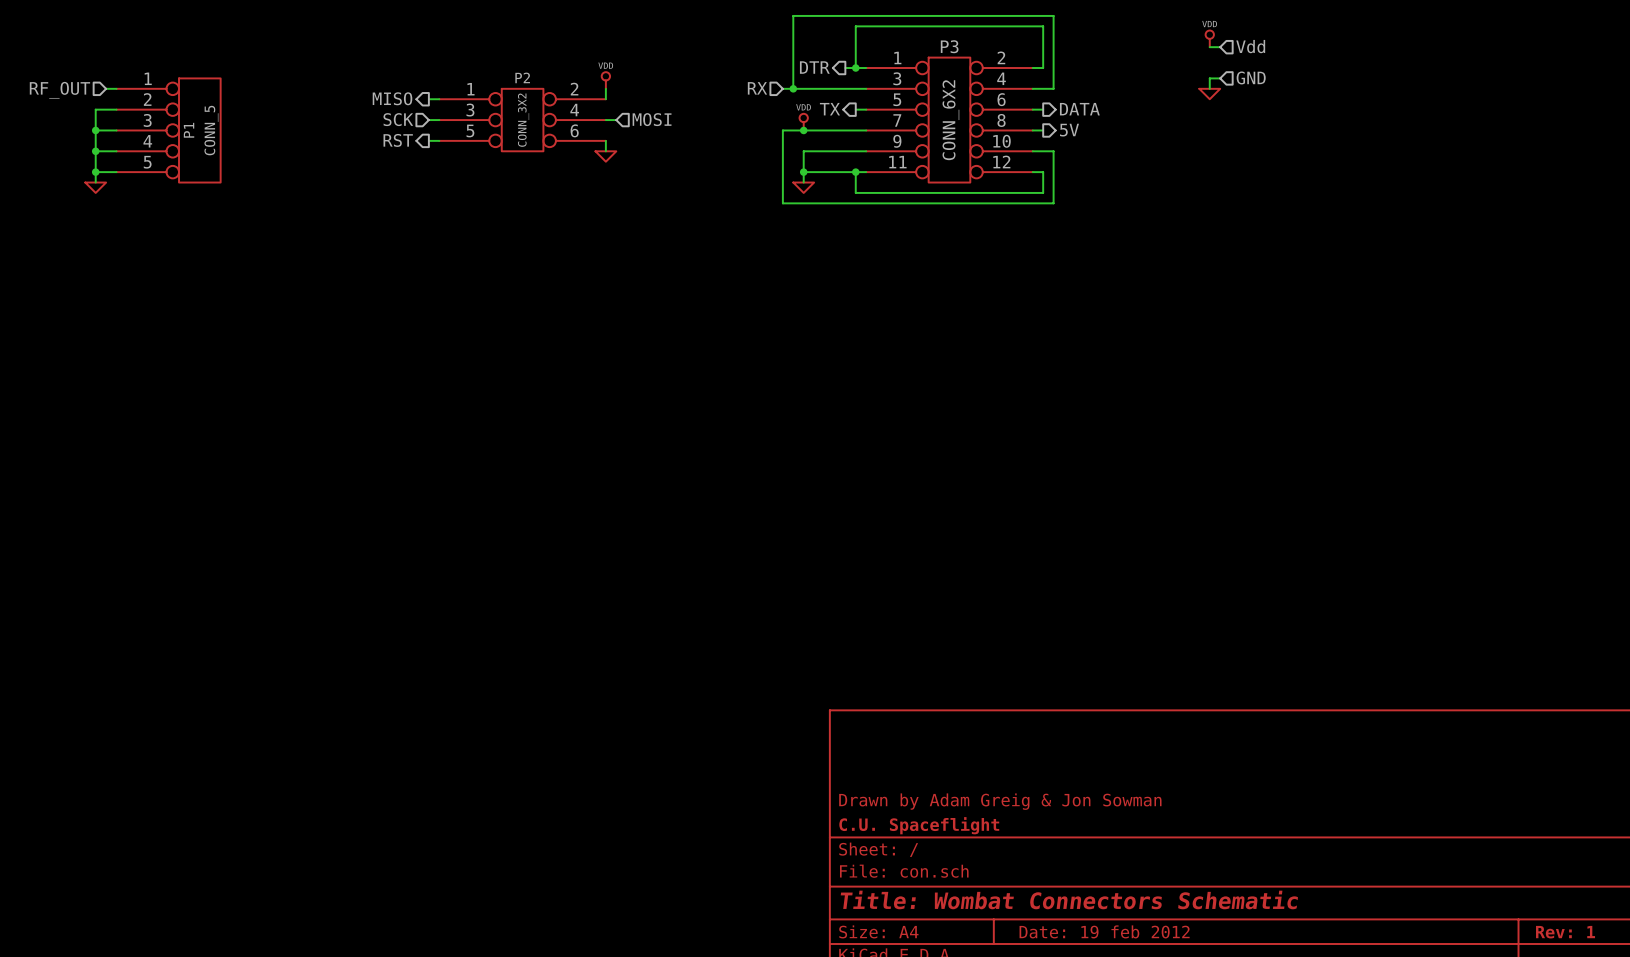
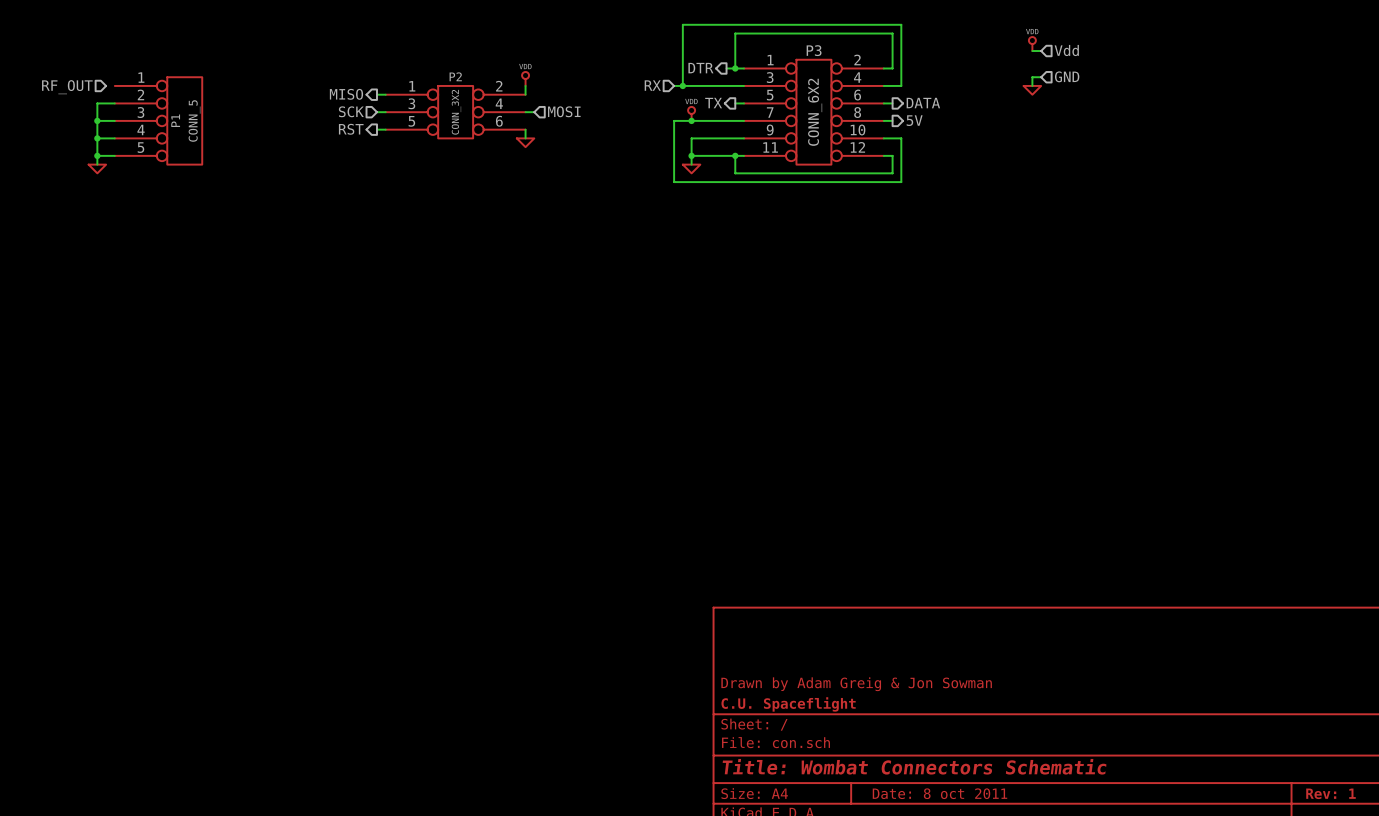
wire: (106, 88) (116, 88) -> none
title block: Date: 19 feb 2012 (1104, 931) -> Date: 8 oct 2011 (939, 793)

